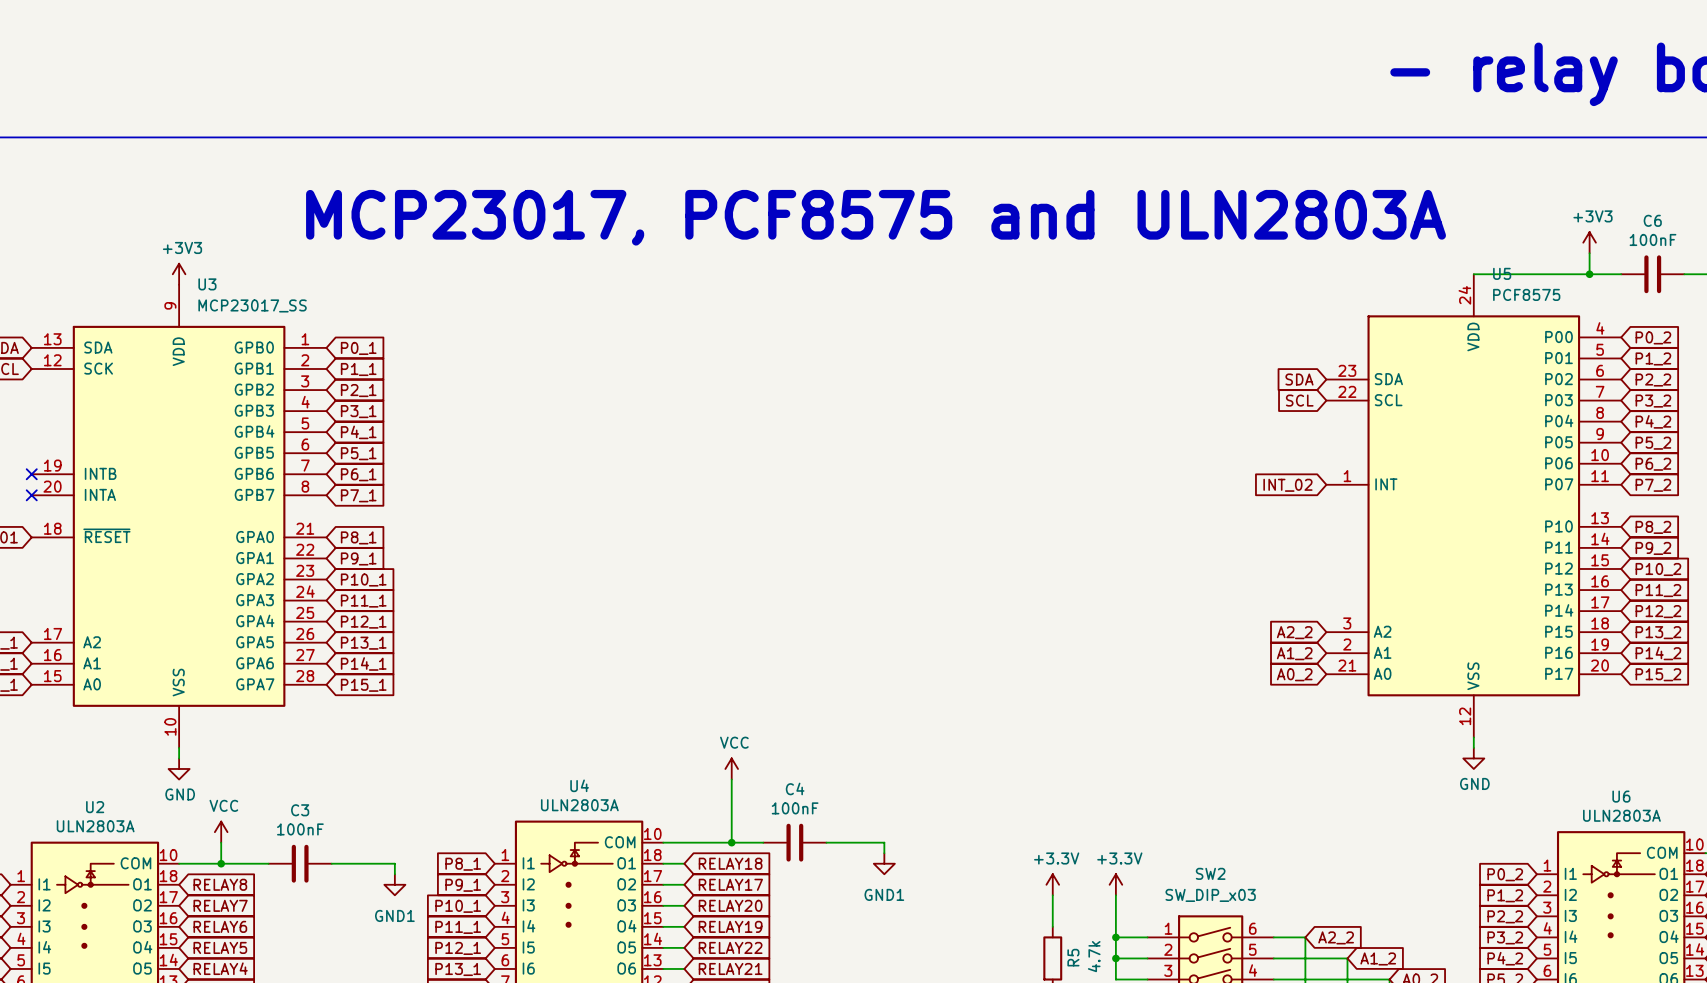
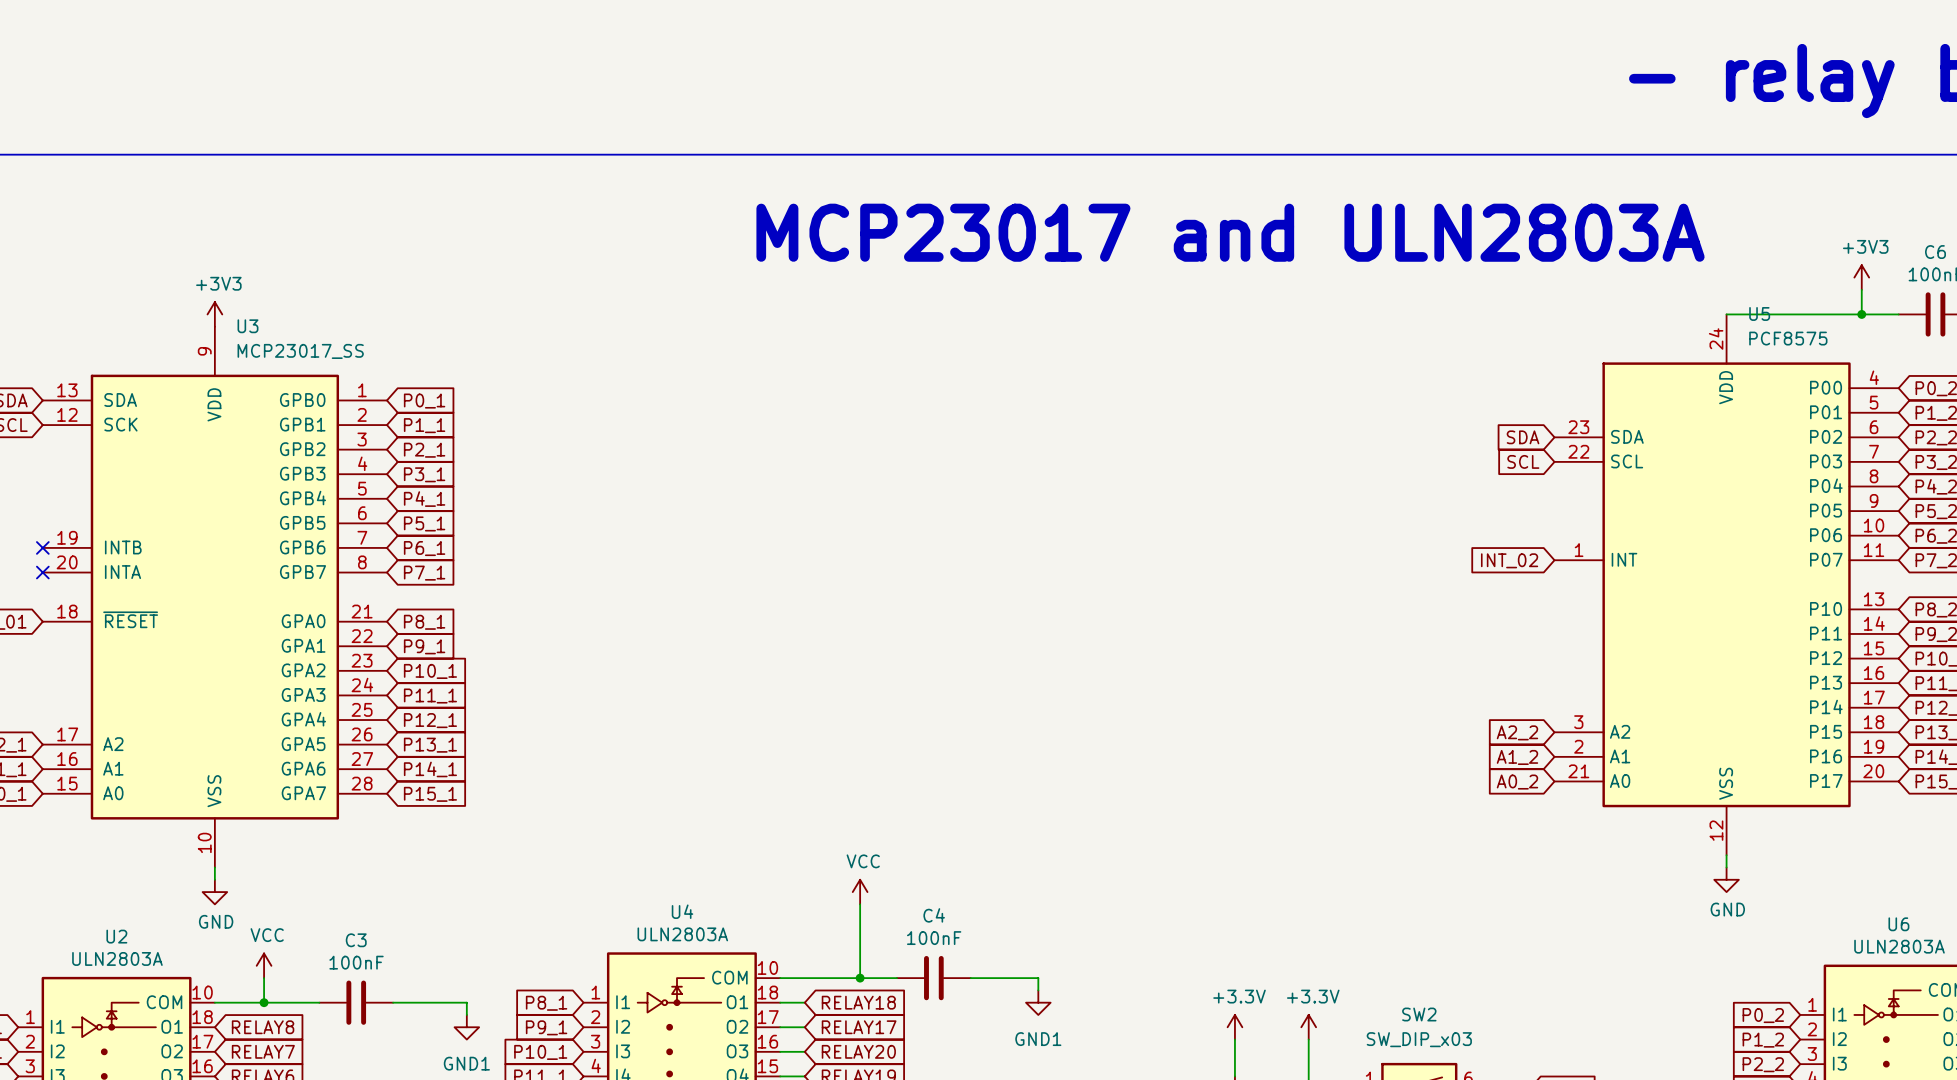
text: none -> MCP23017 and ULN2803A (1230, 232)
text: MCP23017, PCF8575 and ULN2803A (876, 217) -> none

